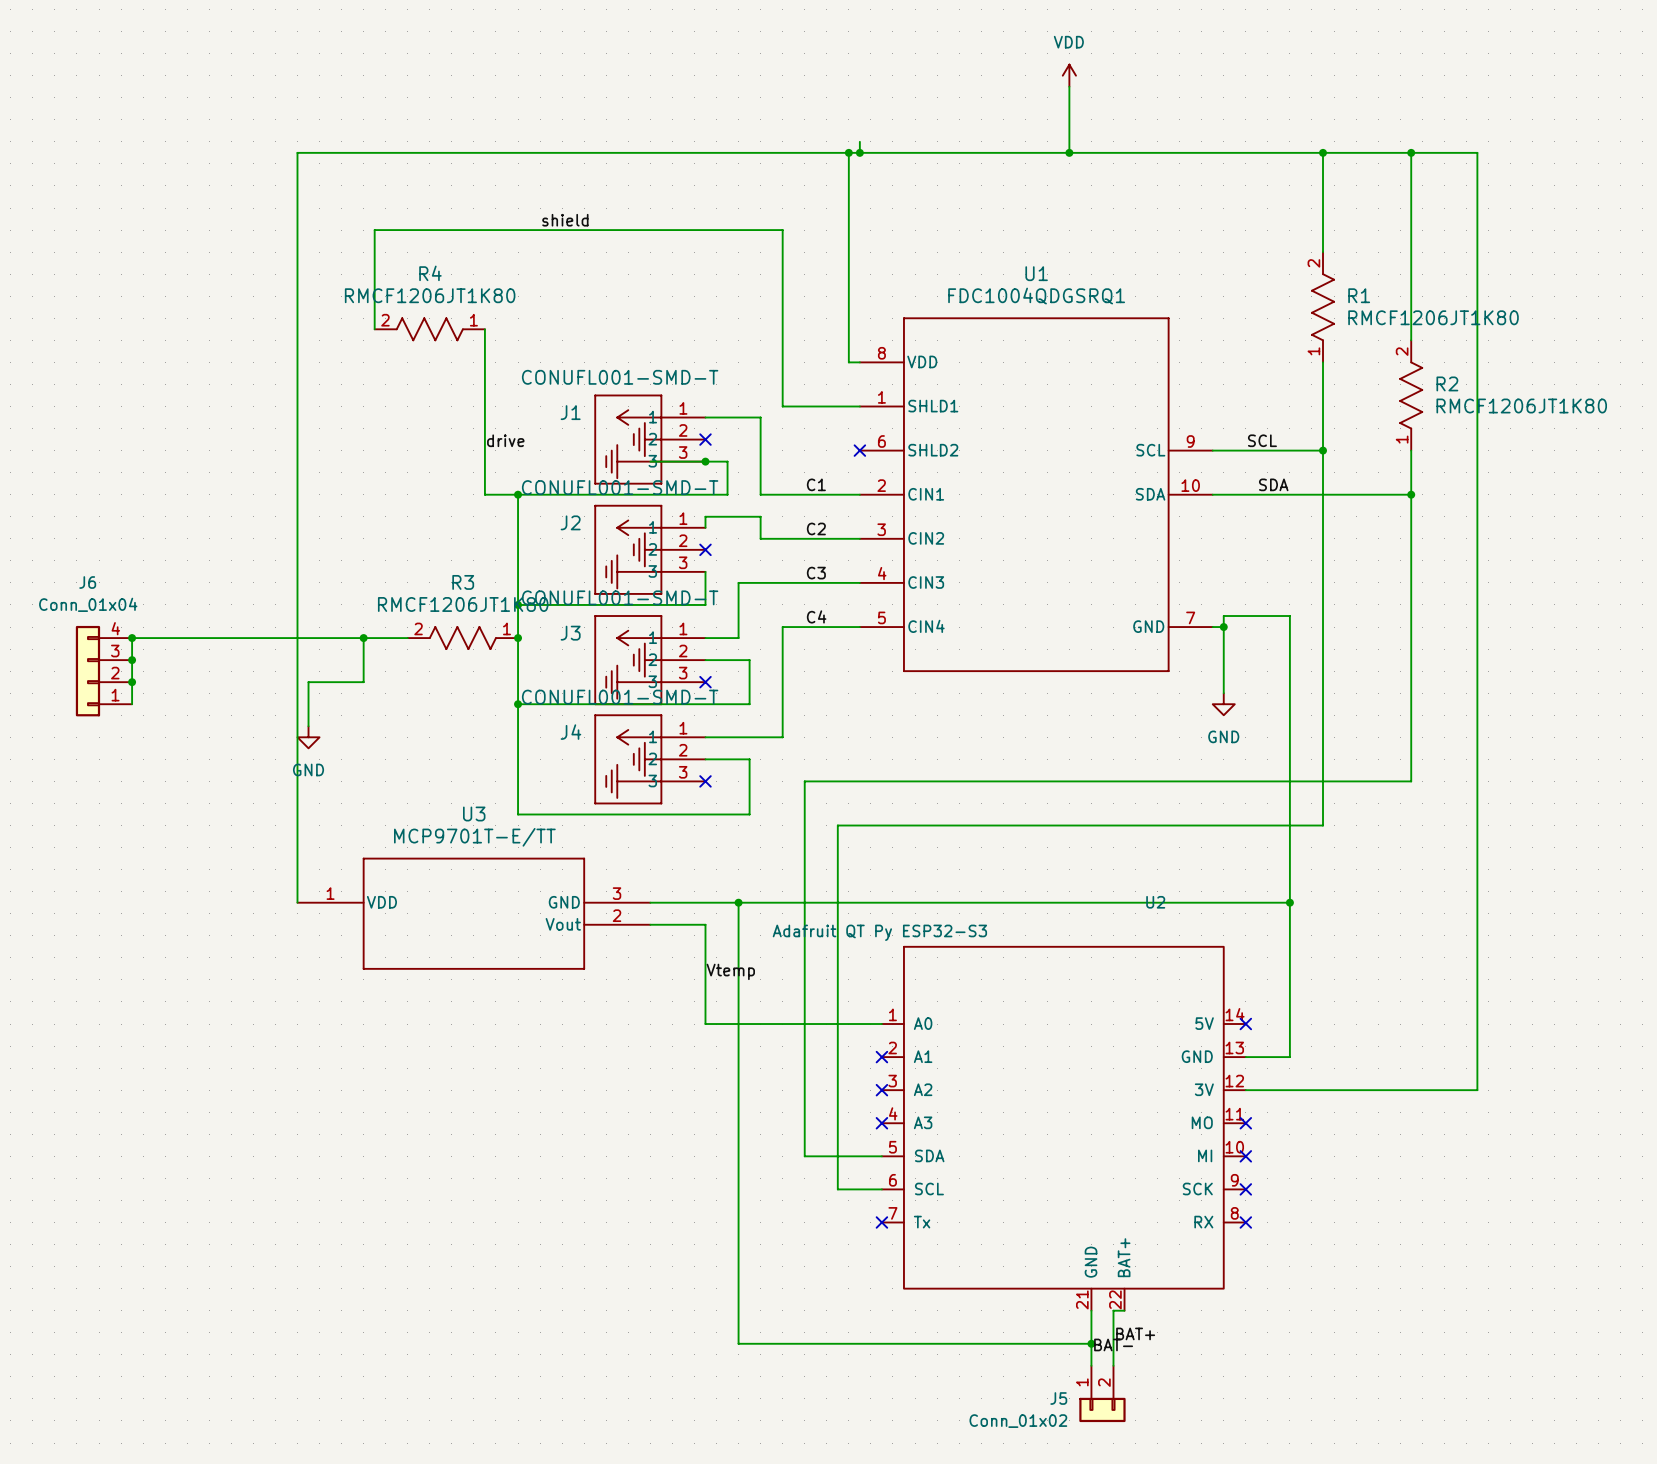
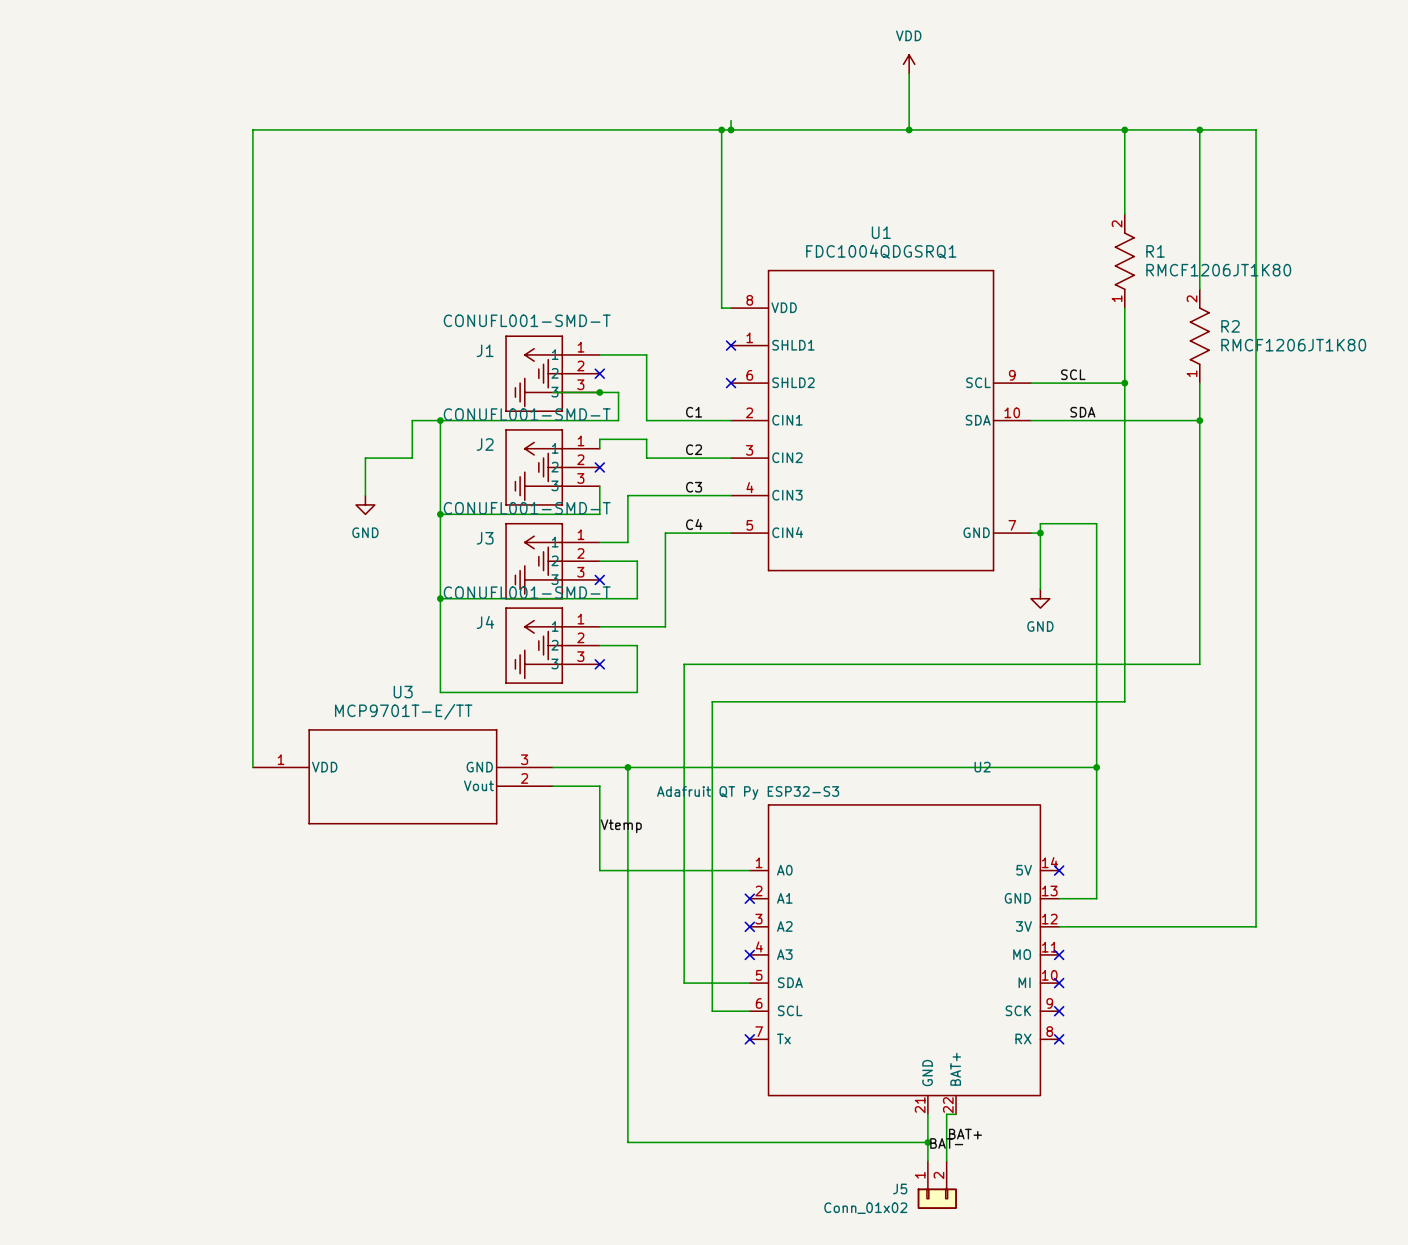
label: shield (565, 220) -> none
wire: (374, 329) (374, 230) (782, 230) (782, 406) (859, 406) -> none
R4: RMCF1206JT1K80 (429, 329) -> none
wire: (484, 329) (484, 494) -> (365, 495) (365, 458) (412, 458) (412, 420)
no-connect mark: none -> (731, 345)
label: drive (505, 440) -> none
junction: (132, 638) -> none
wire: (363, 638) (363, 682) (308, 682) (308, 726) -> none
junction: (363, 638) -> none
wire: (407, 638) (132, 638) (132, 704) -> none
R3: RMCF1206JT1K80 (462, 638) -> none
junction: (518, 638) -> none
junction: (132, 660) -> none
J6: Conn_01x04 (103, 671) -> none
junction: (132, 682) -> none
power symbol position: GND (308, 737) -> GND (365, 504)

